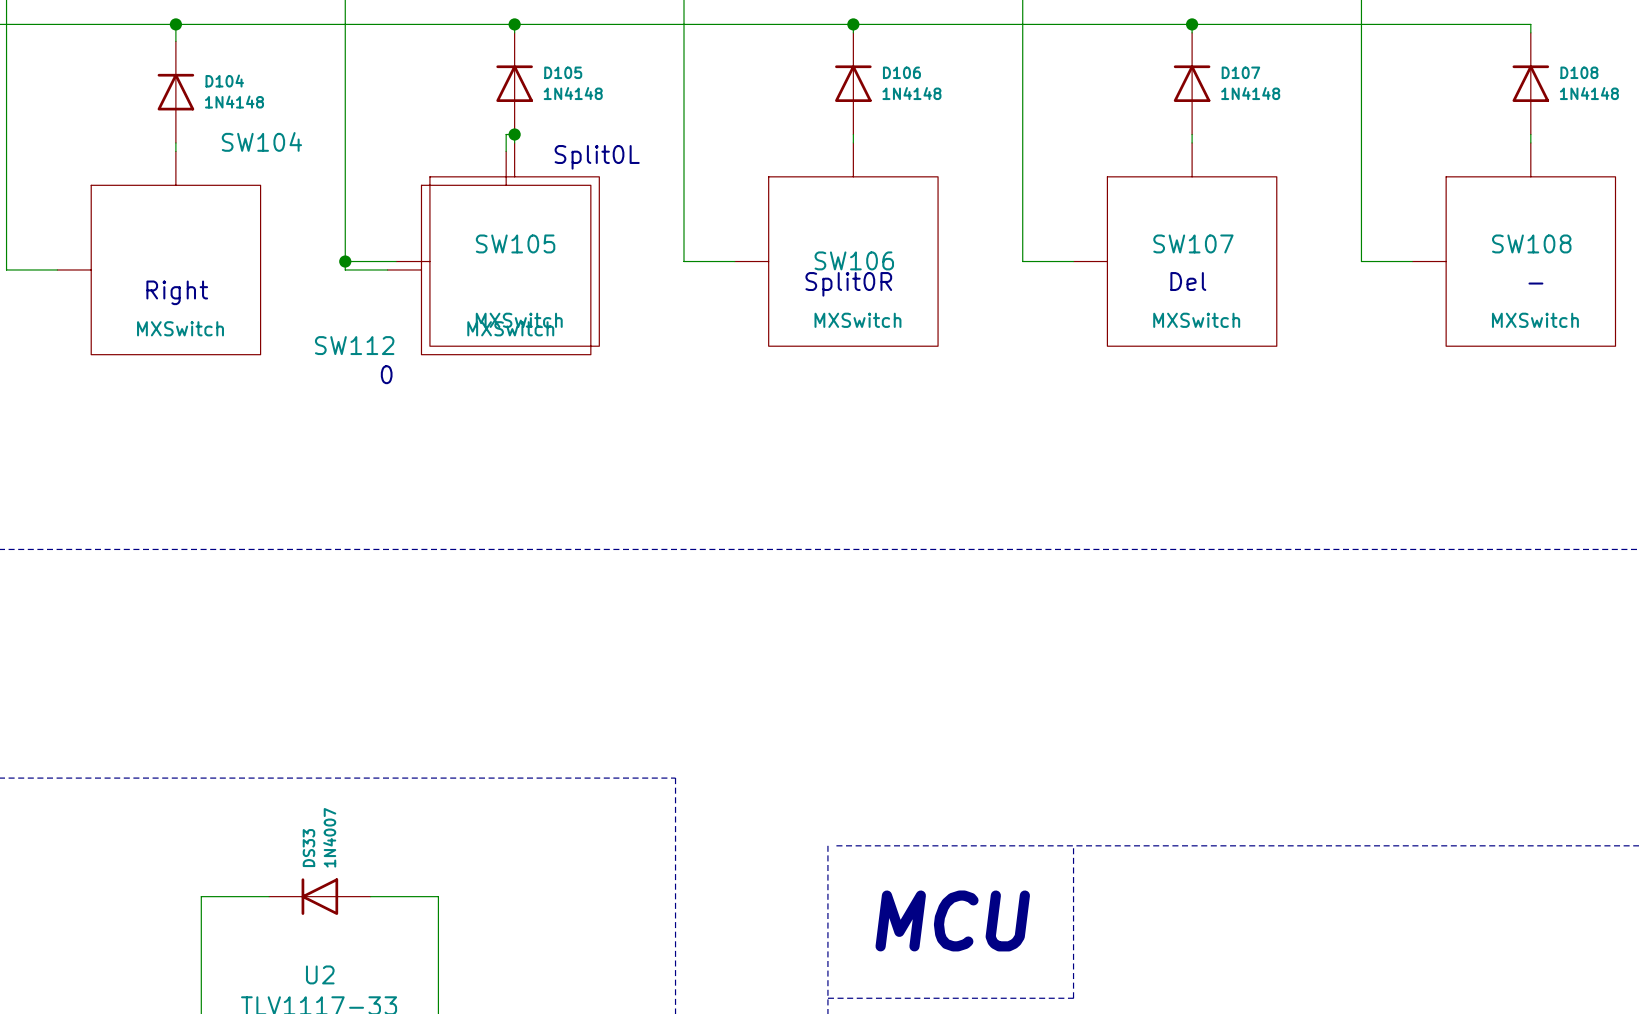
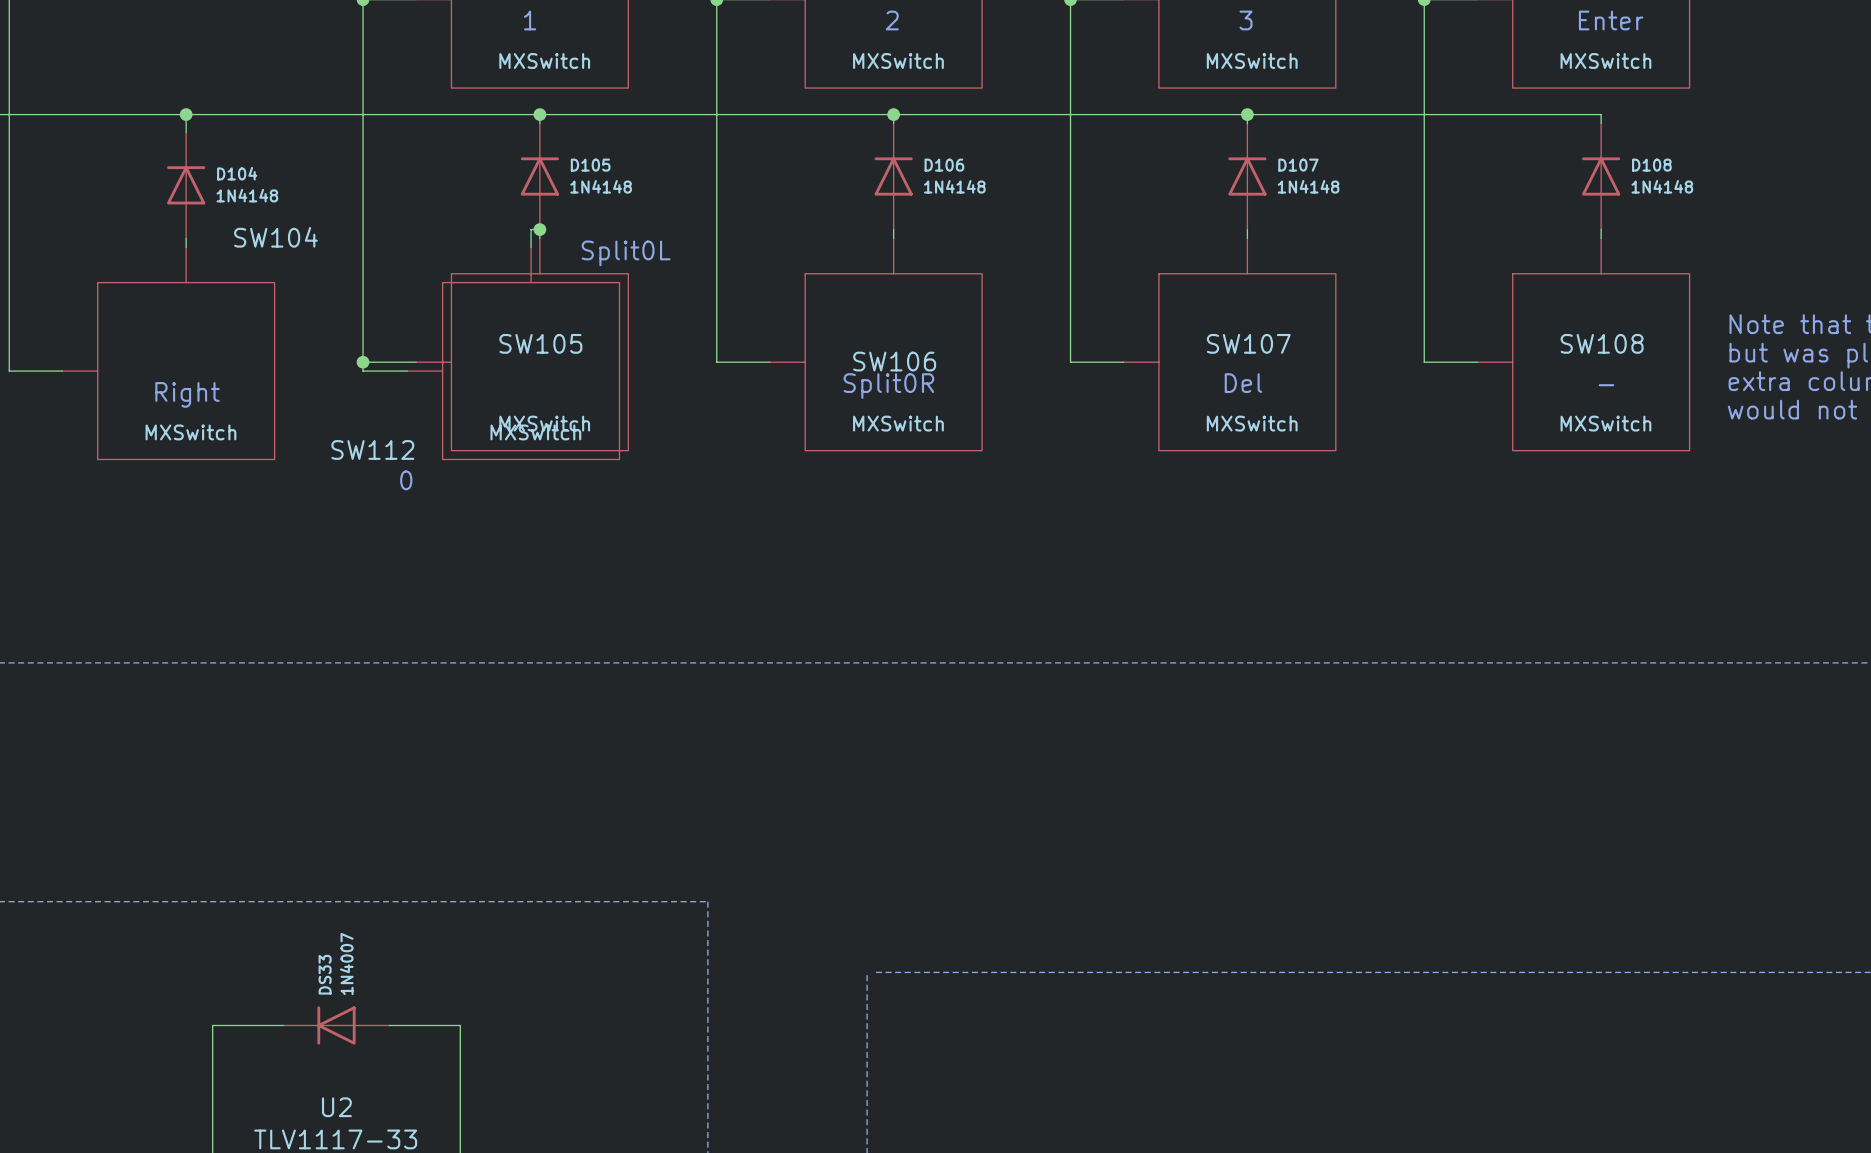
line: (1073, 845) (1073, 998) (827, 998) -> none
text: MCU (952, 920) -> none

